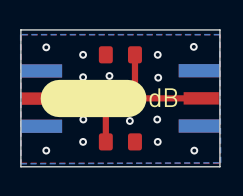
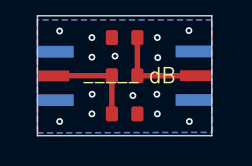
line: (127, 98) (59, 98) -> none

